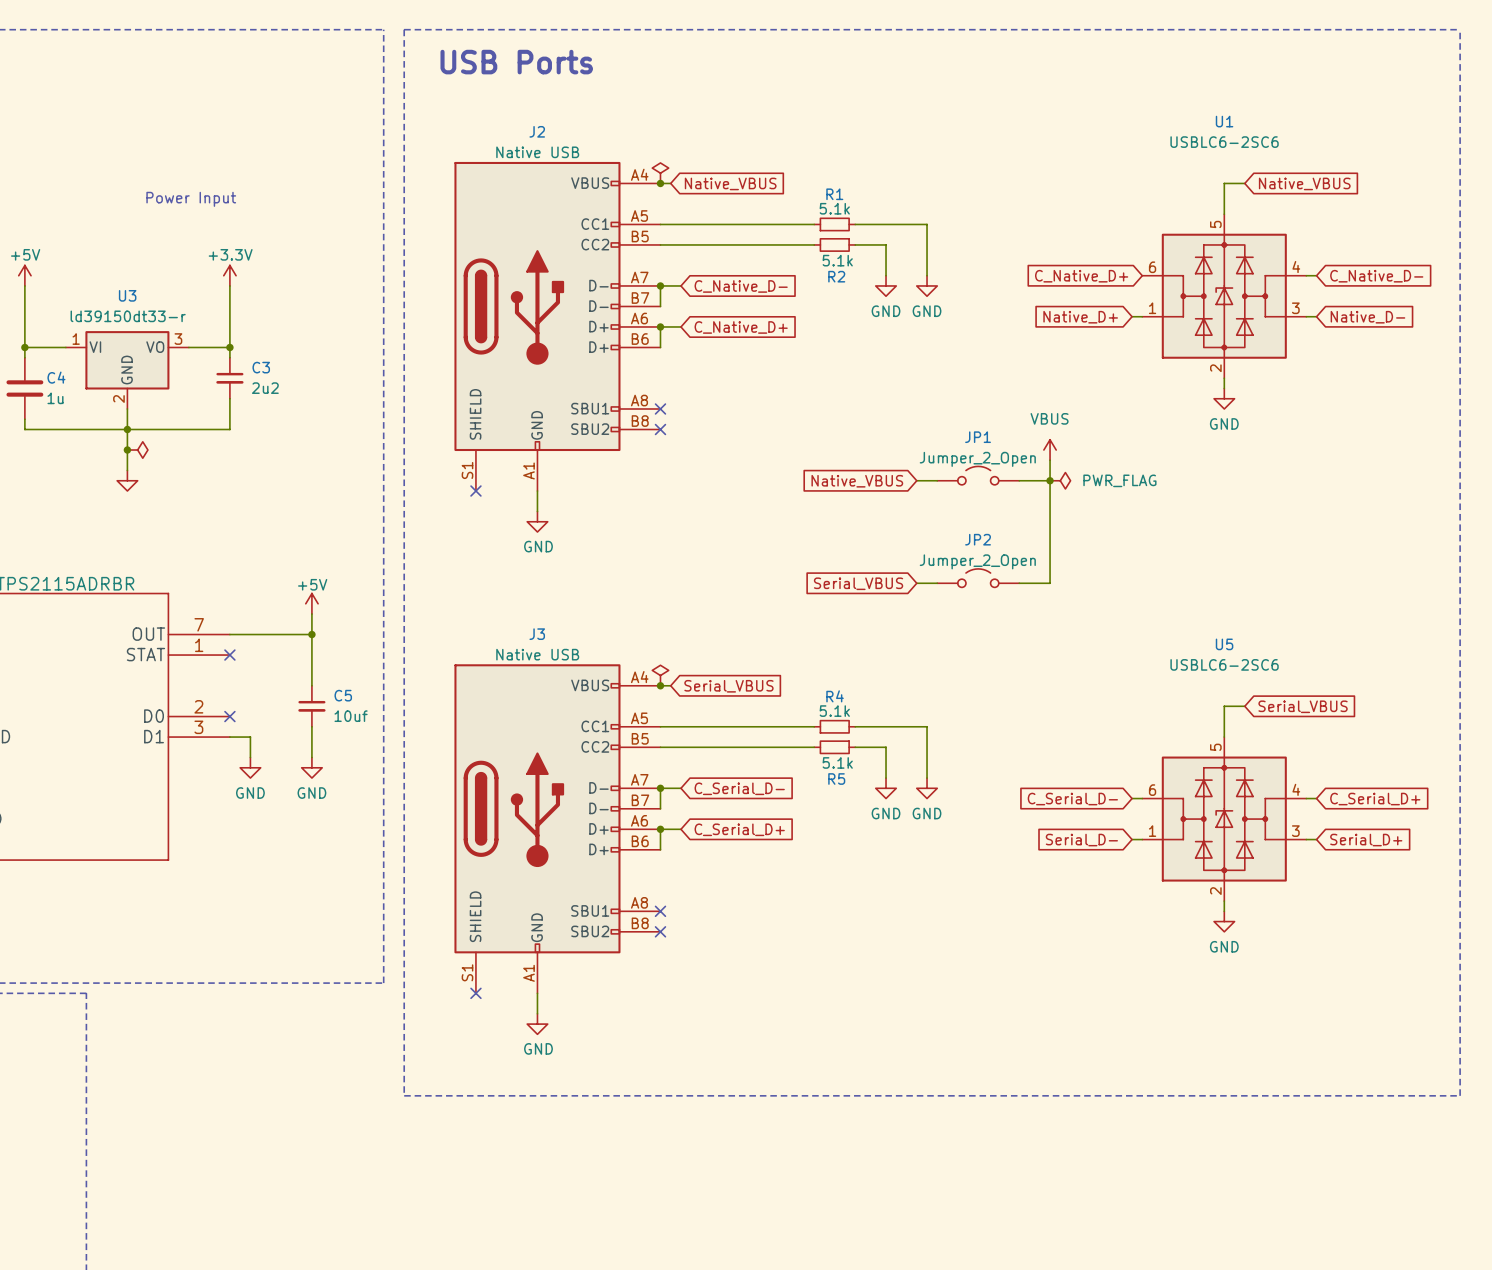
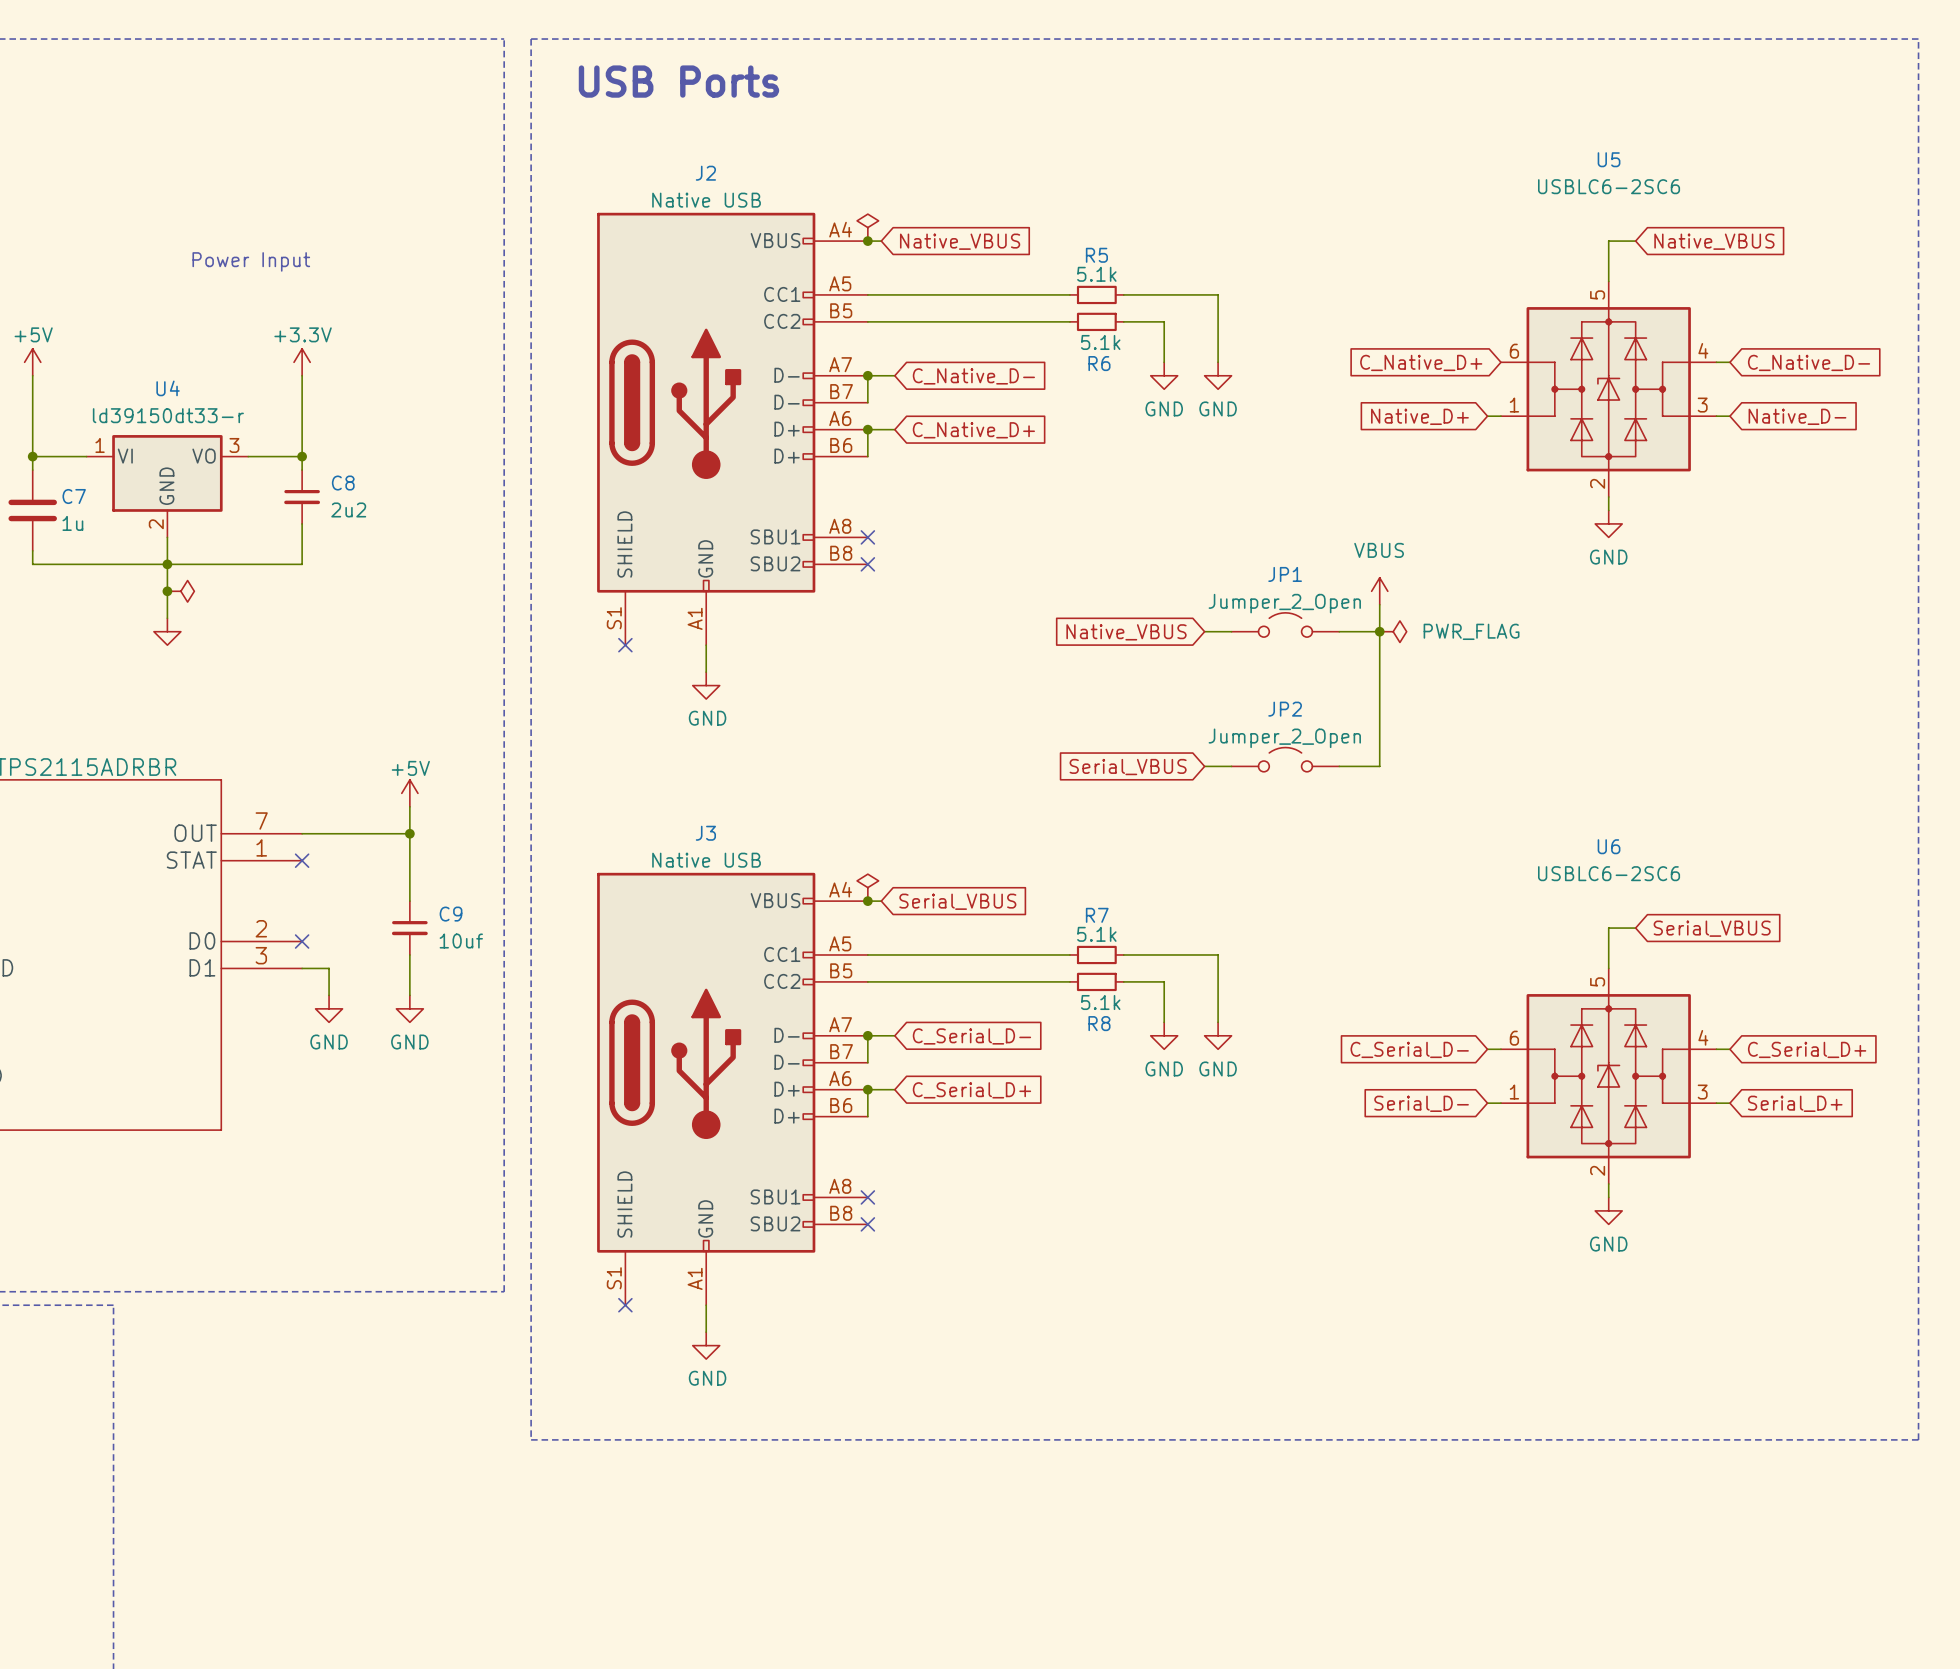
U1 name: U1 (1224, 121) -> U5 (1609, 159)
R1 name: R1 (834, 194) -> R5 (1096, 255)
R2 name: R2 (836, 276) -> R6 (1099, 363)
U3 name: U3 (127, 295) -> U4 (168, 388)
C3 name: C3 (261, 367) -> C8 (343, 483)
C4 name: C4 (56, 377) -> C7 (74, 496)
U5 name: U5 (1224, 644) -> U6 (1609, 846)
C5 name: C5 (343, 695) -> C9 (451, 914)
R4 name: R4 (835, 696) -> R7 (1097, 915)
R5 name: R5 (836, 779) -> R8 (1099, 1023)

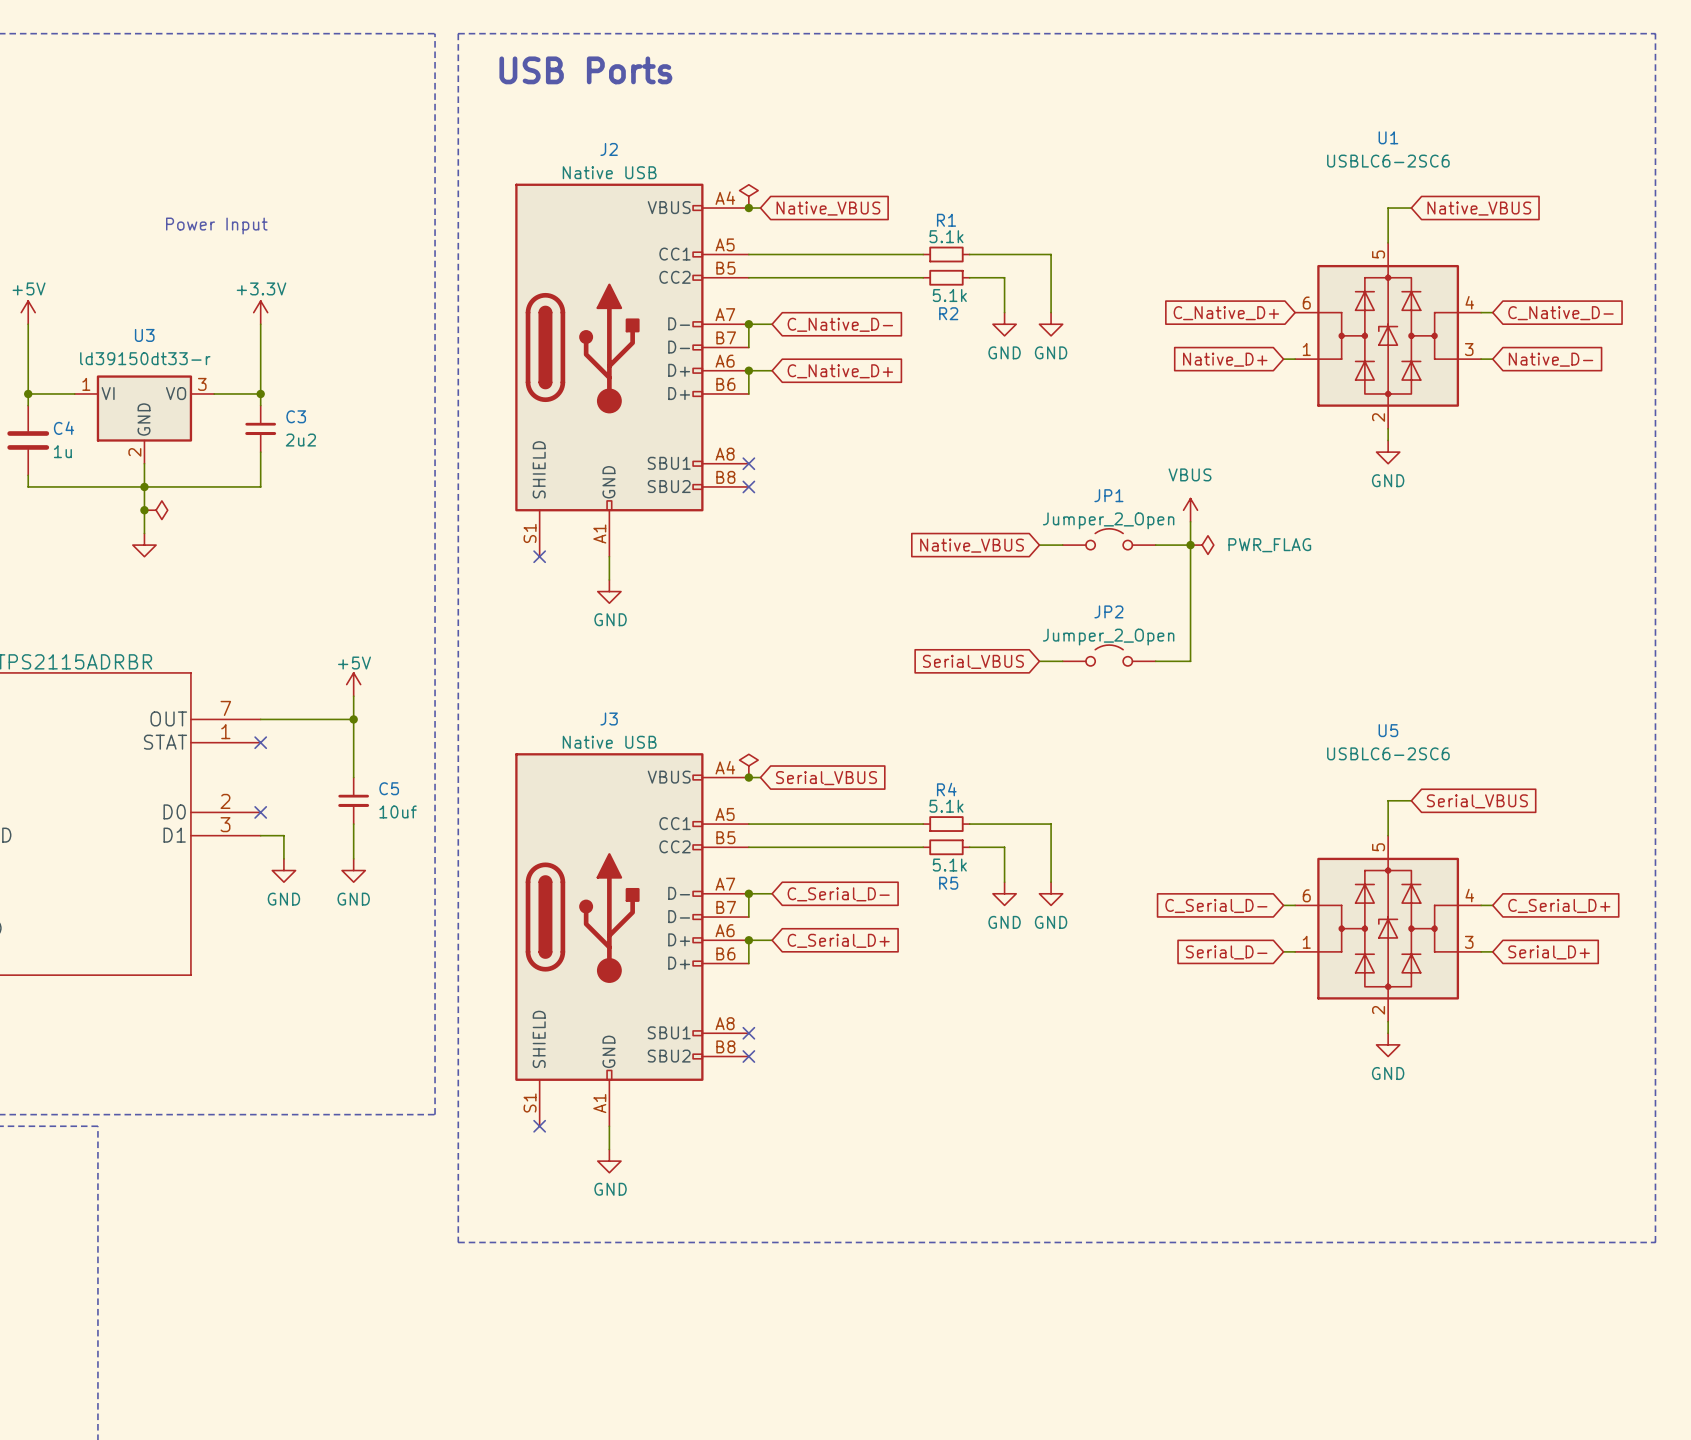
U5 name: U5 (1609, 159) -> U1 (1388, 137)
R5 name: R5 (1096, 255) -> R1 (946, 220)
R6 name: R6 (1099, 363) -> R2 (948, 313)
U4 name: U4 (168, 388) -> U3 (144, 335)
C8 name: C8 (343, 483) -> C3 (296, 416)
C7 name: C7 (74, 496) -> C4 (64, 428)
U6 name: U6 (1609, 846) -> U5 (1388, 730)
C9 name: C9 (451, 914) -> C5 (389, 788)
R7 name: R7 (1097, 915) -> R4 (946, 789)
R8 name: R8 (1099, 1023) -> R5 (948, 883)

